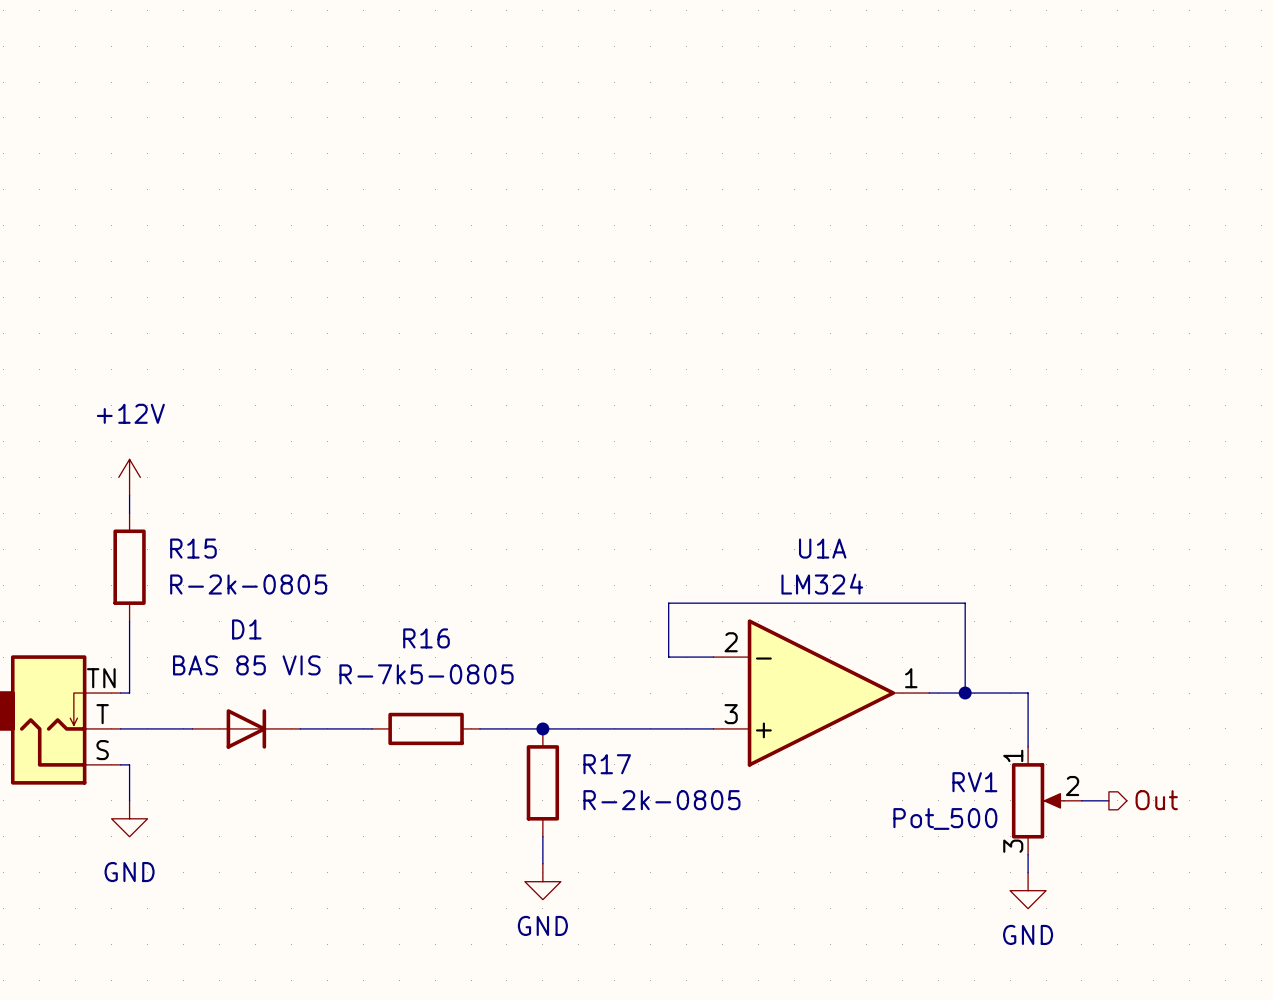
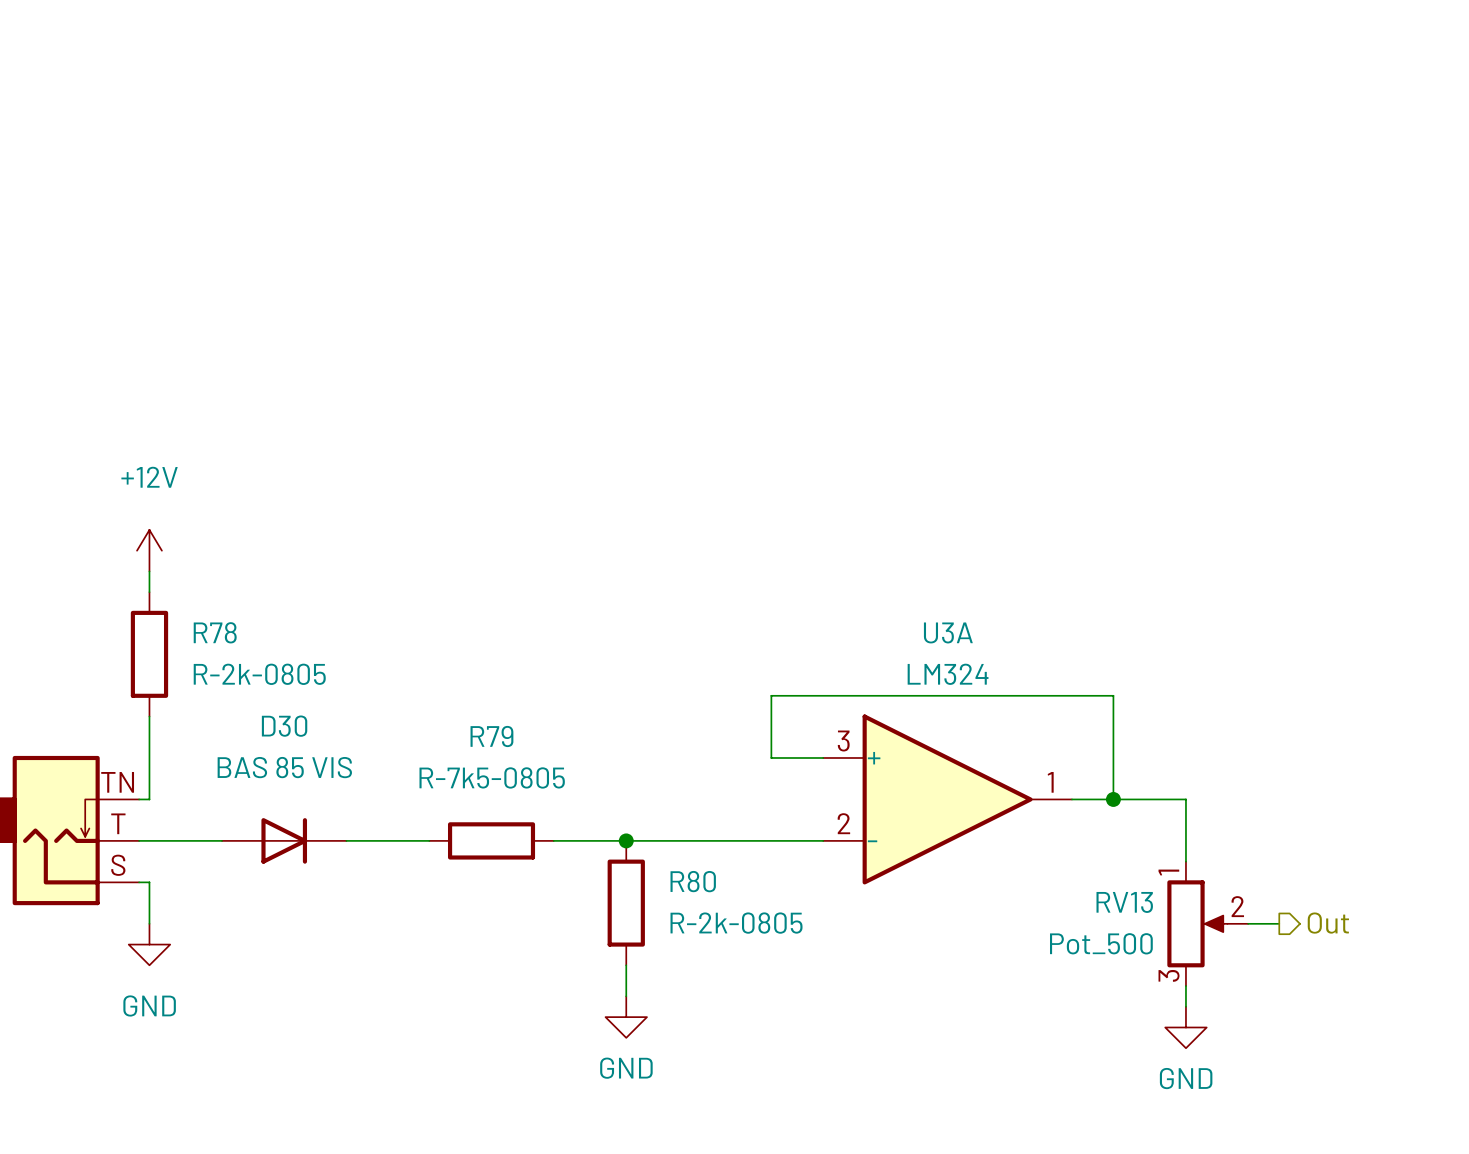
R15 name: R15 (193, 548) -> R78 (215, 632)
U1A name: U1A (822, 548) -> U3A (948, 632)
D1 name: D1 (246, 629) -> D30 (284, 726)
R16 name: R16 (426, 638) -> R79 (491, 736)
U1A flip: as is (821, 693) -> up-down (947, 799)
R17 name: R17 (607, 764) -> R80 (693, 881)
RV1 name: RV1 (974, 782) -> RV13 (1124, 902)

